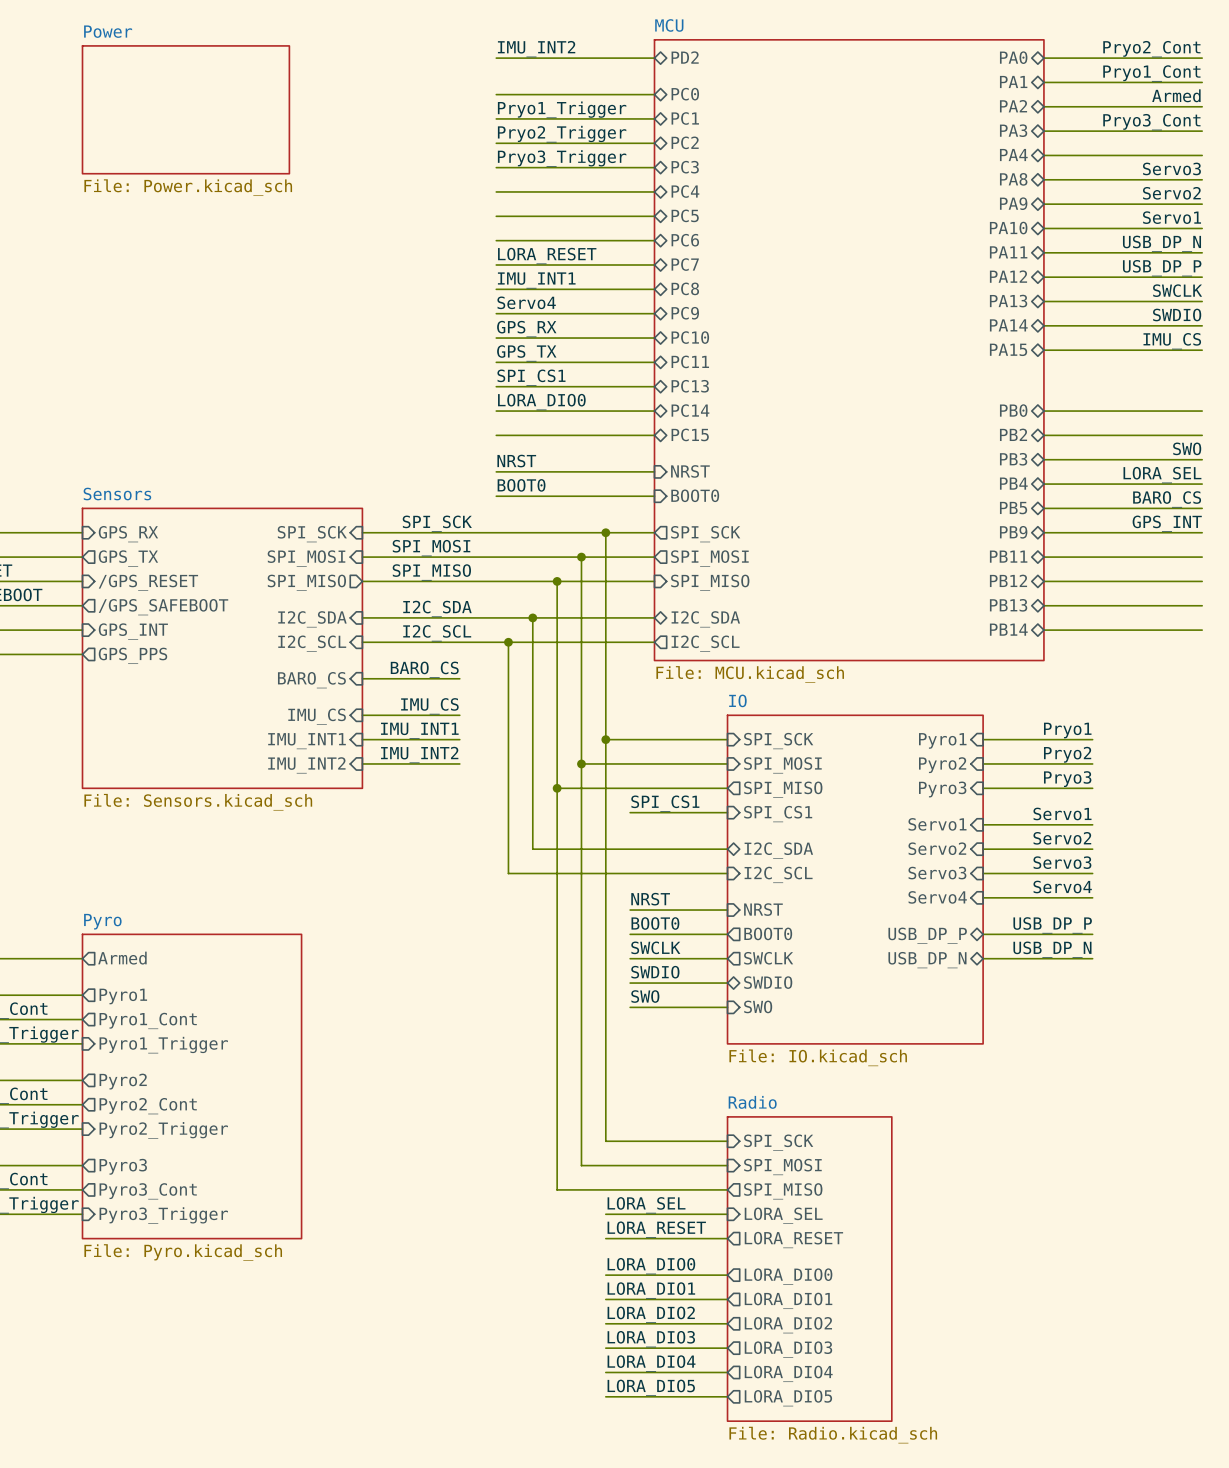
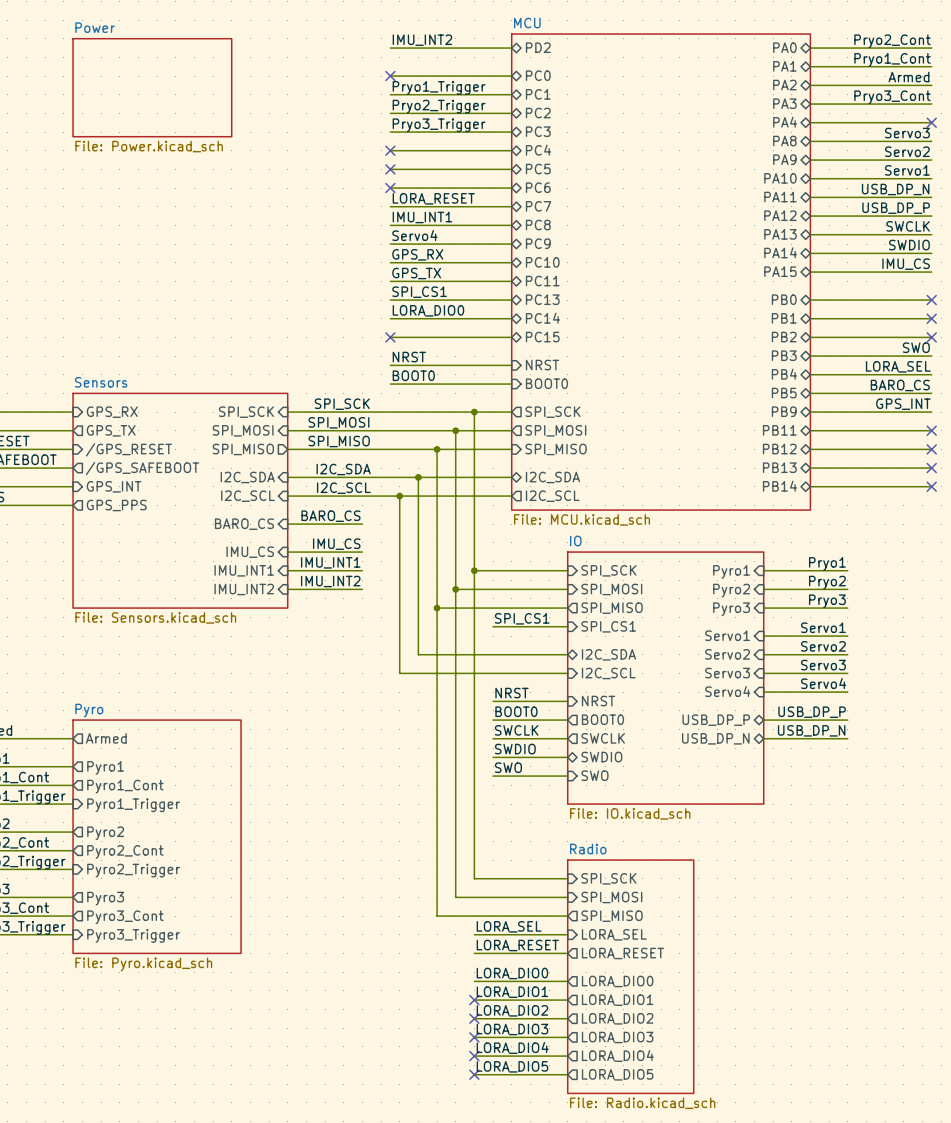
no-connect mark: none -> (390, 76)
no-connect mark: none -> (931, 122)
no-connect mark: none -> (390, 150)
no-connect mark: none -> (390, 169)
no-connect mark: none -> (390, 188)
sheet pin: none -> PB0 (784, 299)
wire: none -> (810, 300) (931, 300)
no-connect mark: none -> (931, 300)
sheet pin: PB0 (1013, 410) -> PB1 (784, 318)
no-connect mark: none -> (931, 318)
no-connect mark: none -> (390, 337)
no-connect mark: none -> (931, 337)
no-connect mark: none -> (931, 430)
no-connect mark: none -> (931, 449)
no-connect mark: none -> (931, 468)
no-connect mark: none -> (931, 486)
no-connect mark: none -> (474, 1000)
no-connect mark: none -> (474, 1018)
no-connect mark: none -> (474, 1037)
no-connect mark: none -> (474, 1056)
no-connect mark: none -> (474, 1074)

